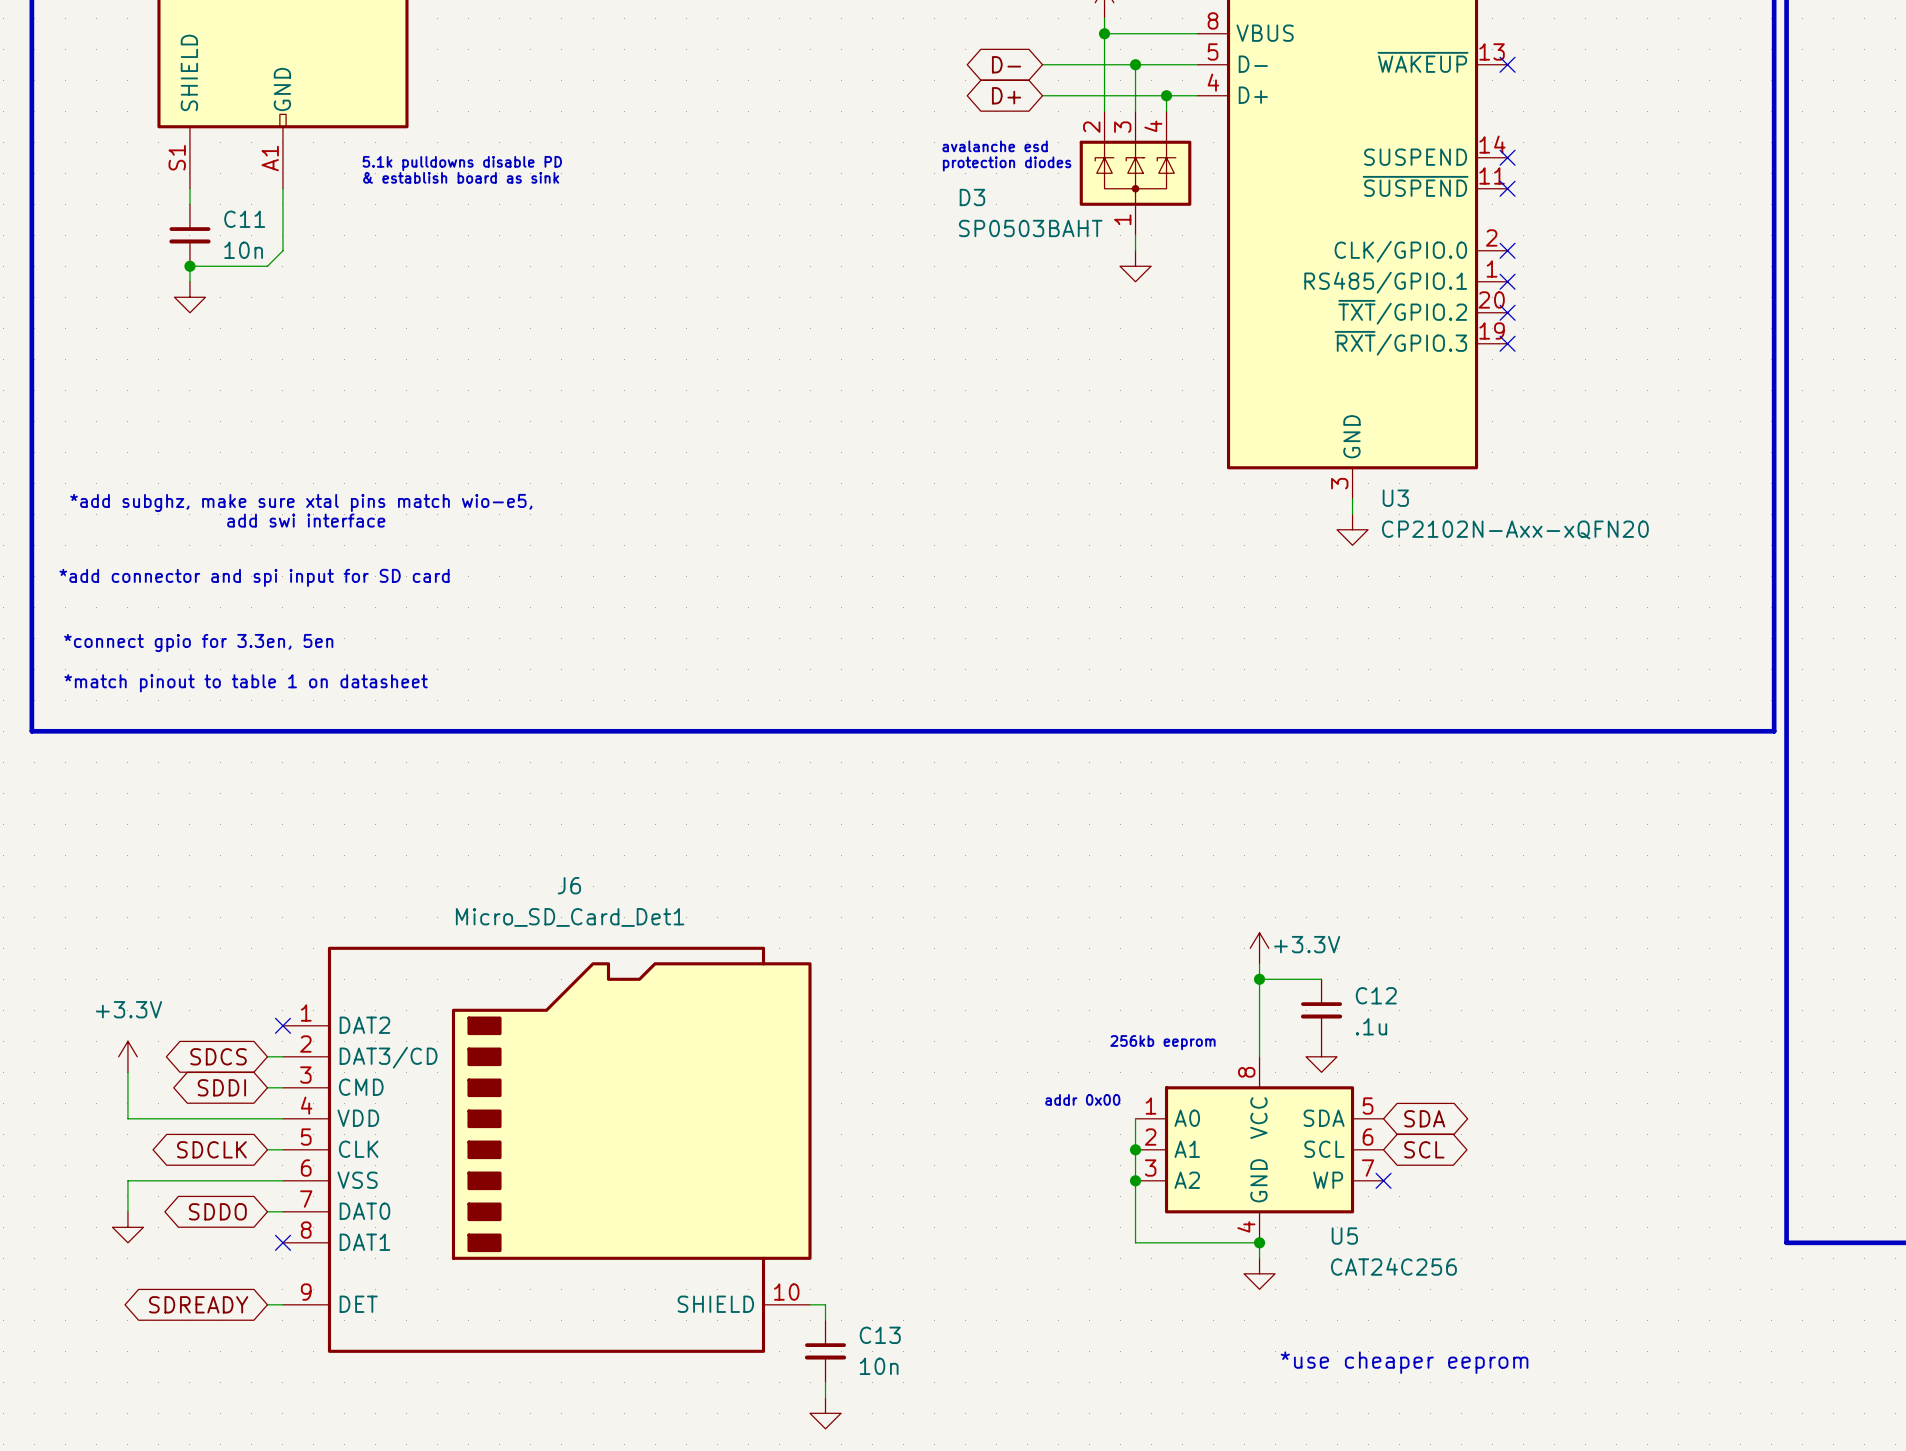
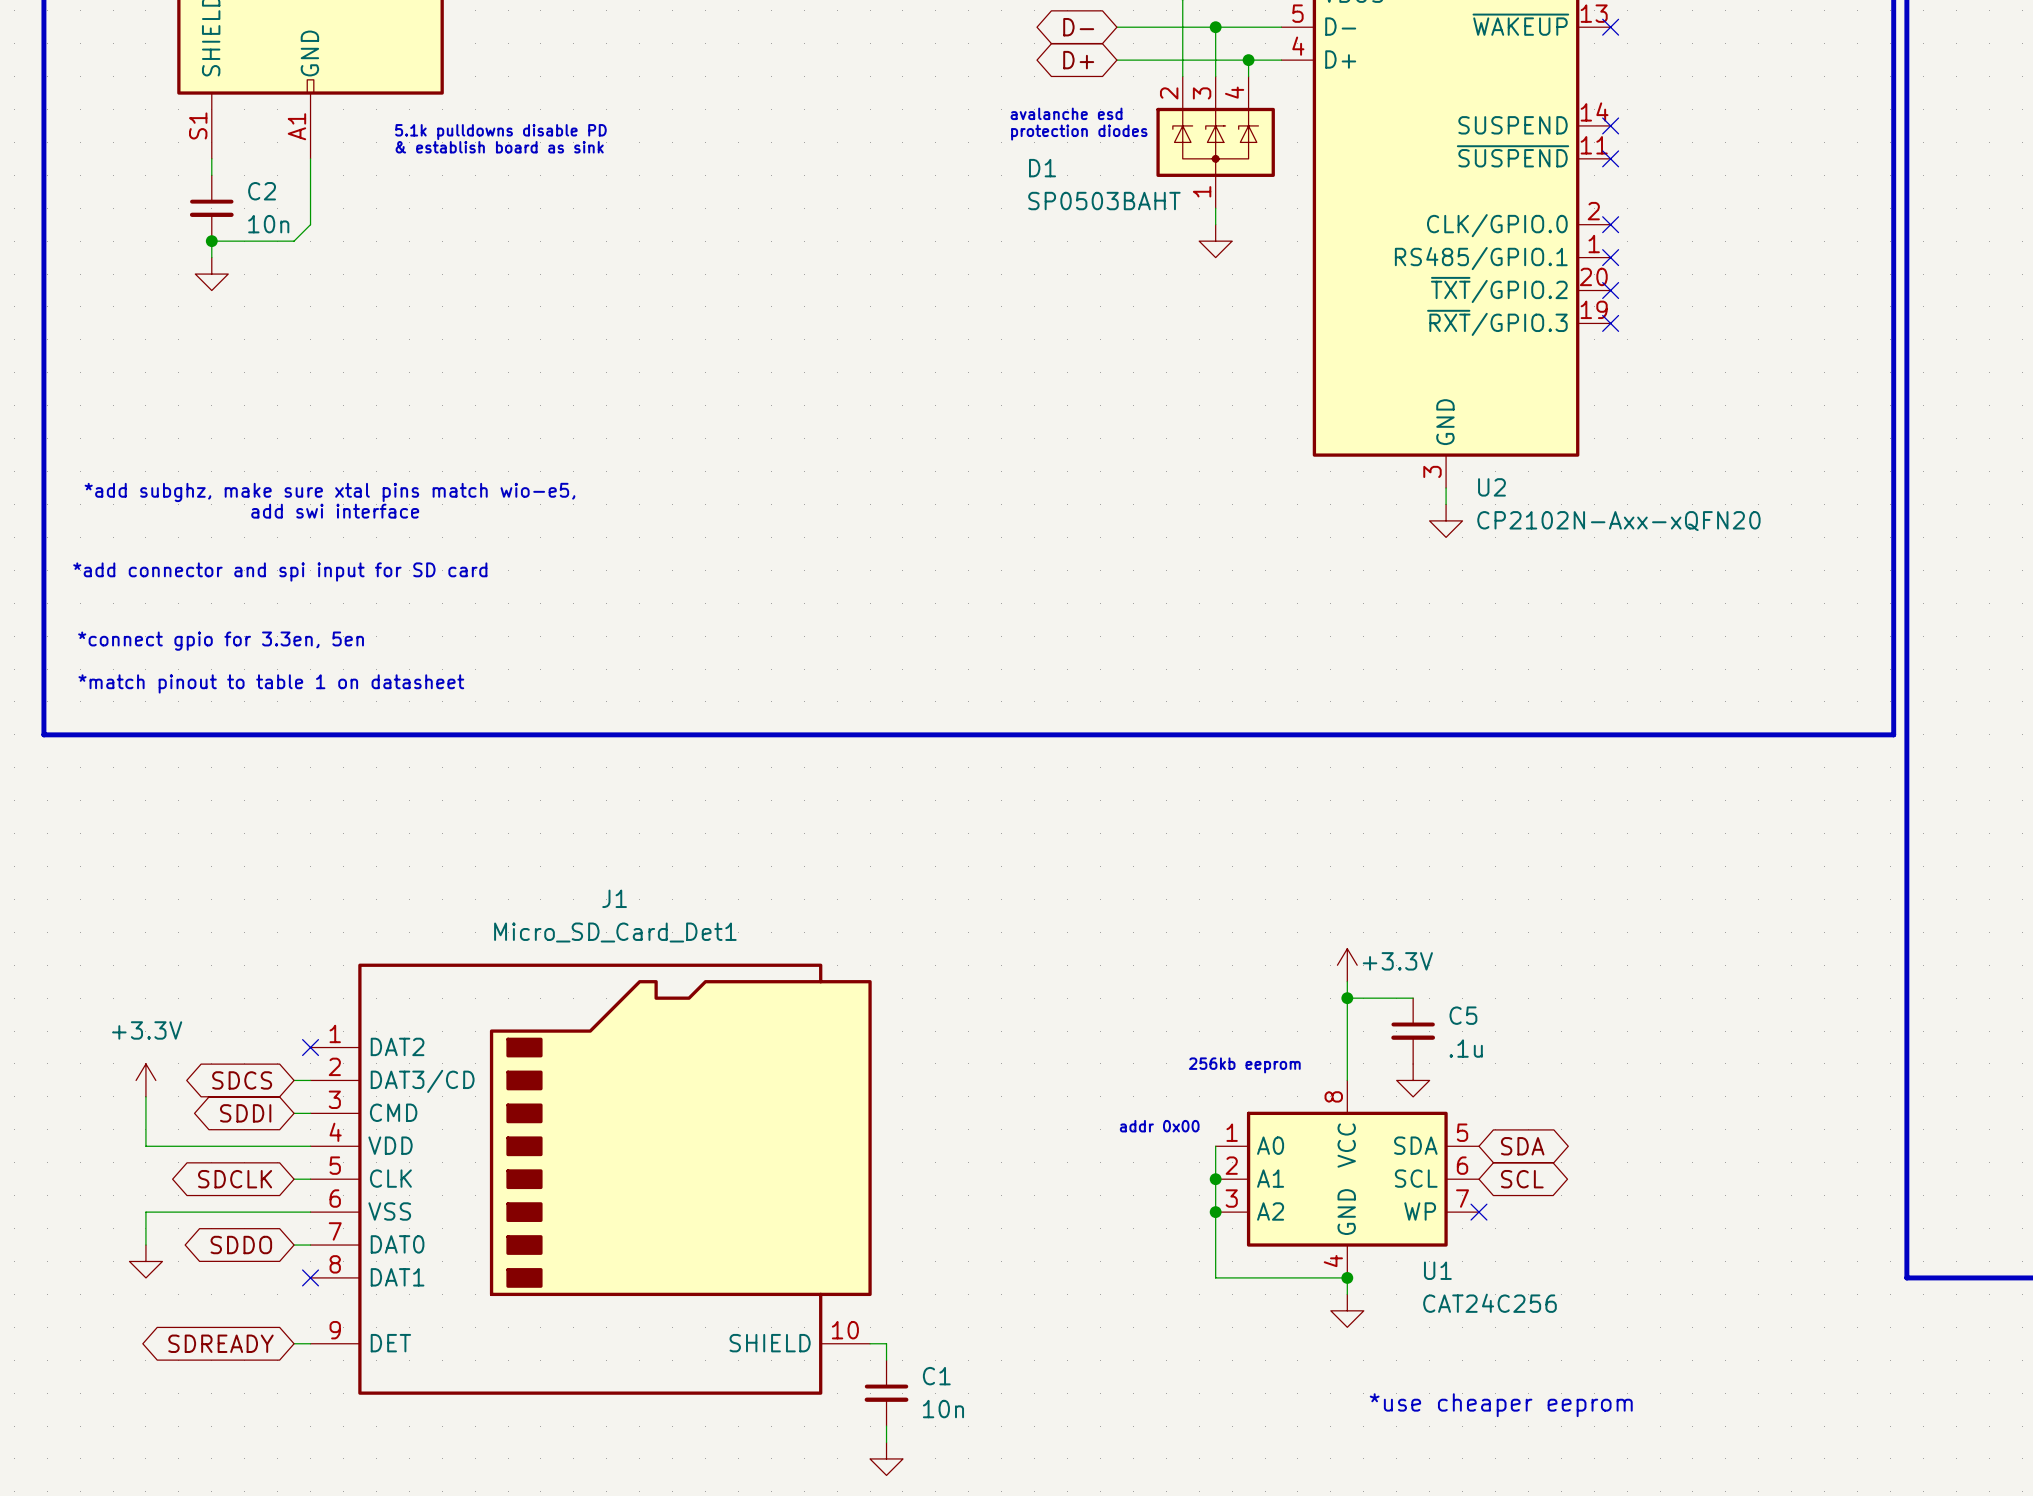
D3 name: D3 (972, 197) -> D1 (1042, 168)
C11 name: C11 (244, 219) -> C2 (262, 191)
U3 name: U3 (1395, 498) -> U2 (1491, 487)
J6 name: J6 (569, 885) -> J1 (614, 898)
C12 name: C12 (1376, 995) -> C5 (1463, 1015)
U5 name: U5 (1344, 1236) -> U1 (1437, 1270)
C13 name: C13 (880, 1335) -> C1 (936, 1376)

